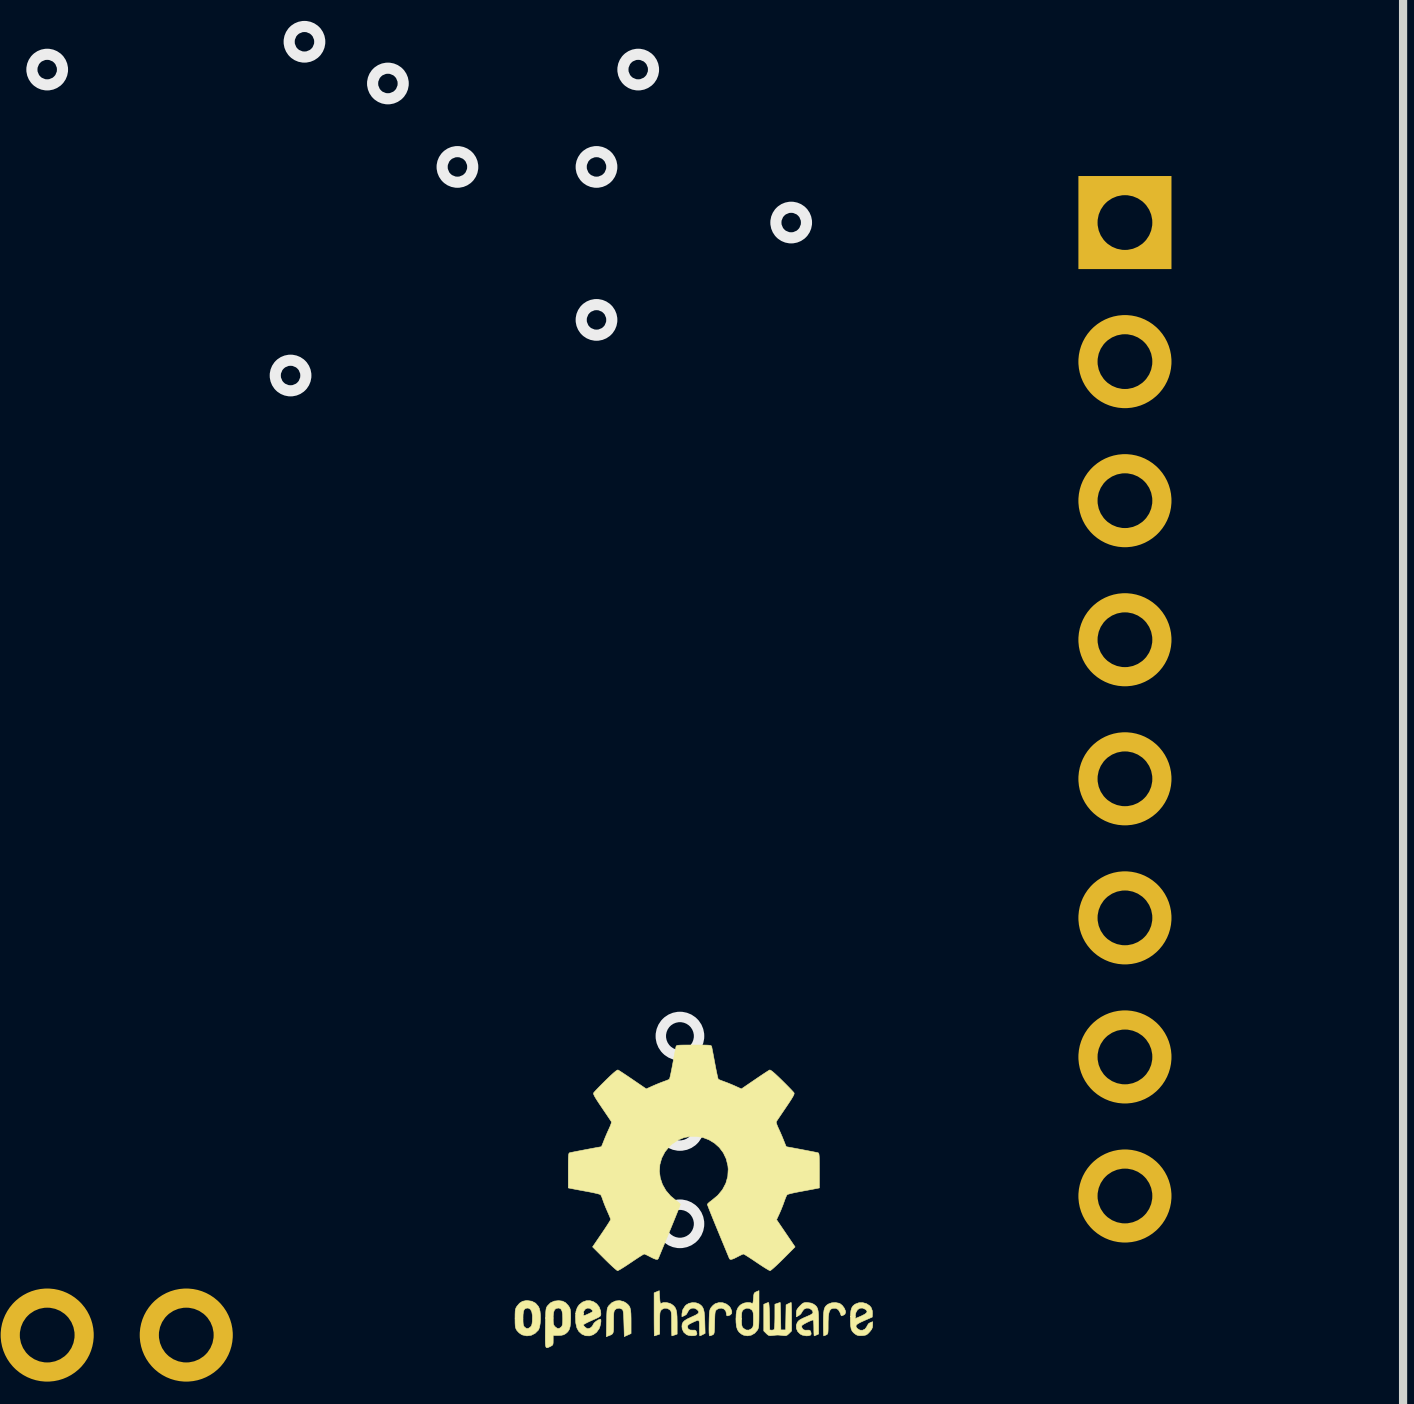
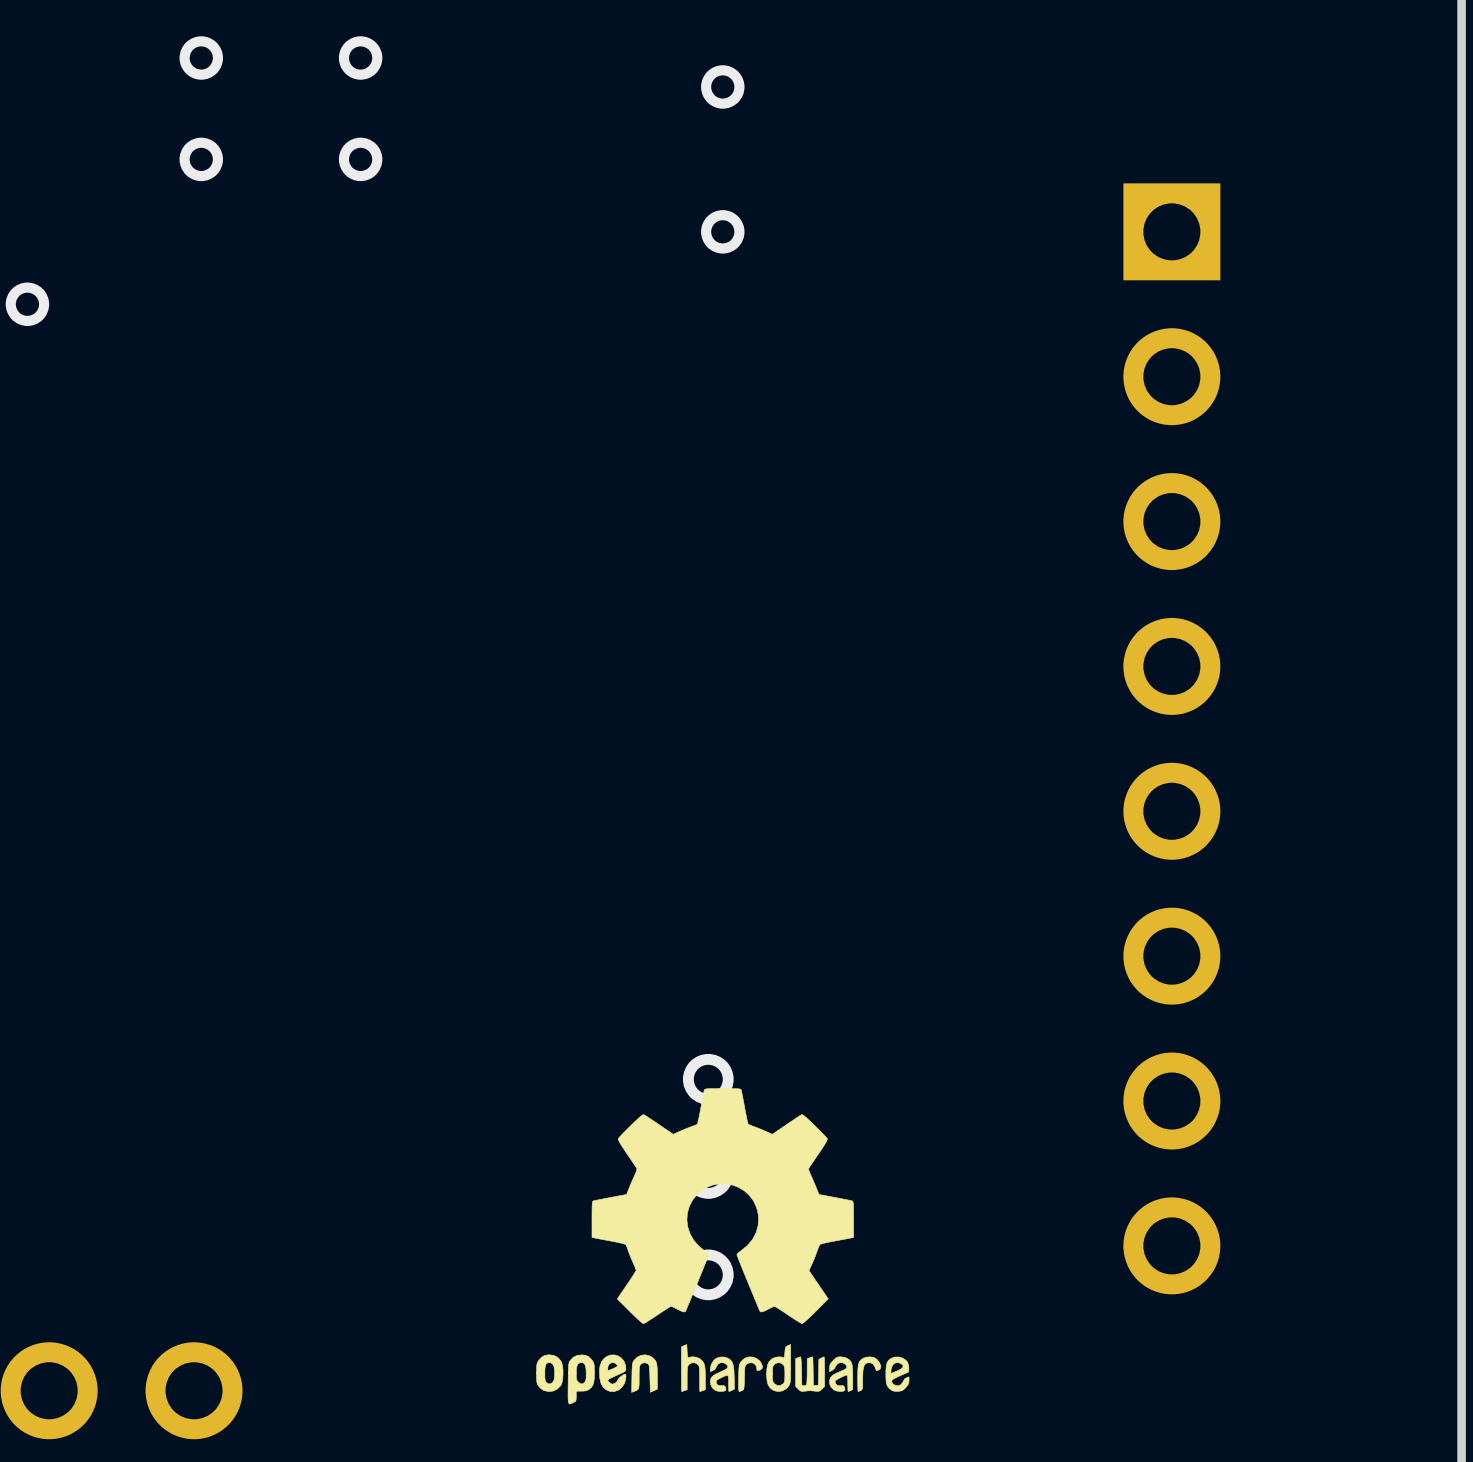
via: (304, 41) -> none
via: none -> (201, 57)
via: none -> (360, 57)
via: (47, 69) -> none
via: (638, 69) -> none
via: (387, 83) -> none
via: none -> (722, 86)
via: none -> (201, 159)
via: none -> (360, 159)
via: (457, 166) -> none
via: (596, 166) -> none
via: none -> (722, 231)
via: (791, 222) -> none
via: none -> (27, 304)
via: (596, 319) -> none
via: (290, 375) -> none

